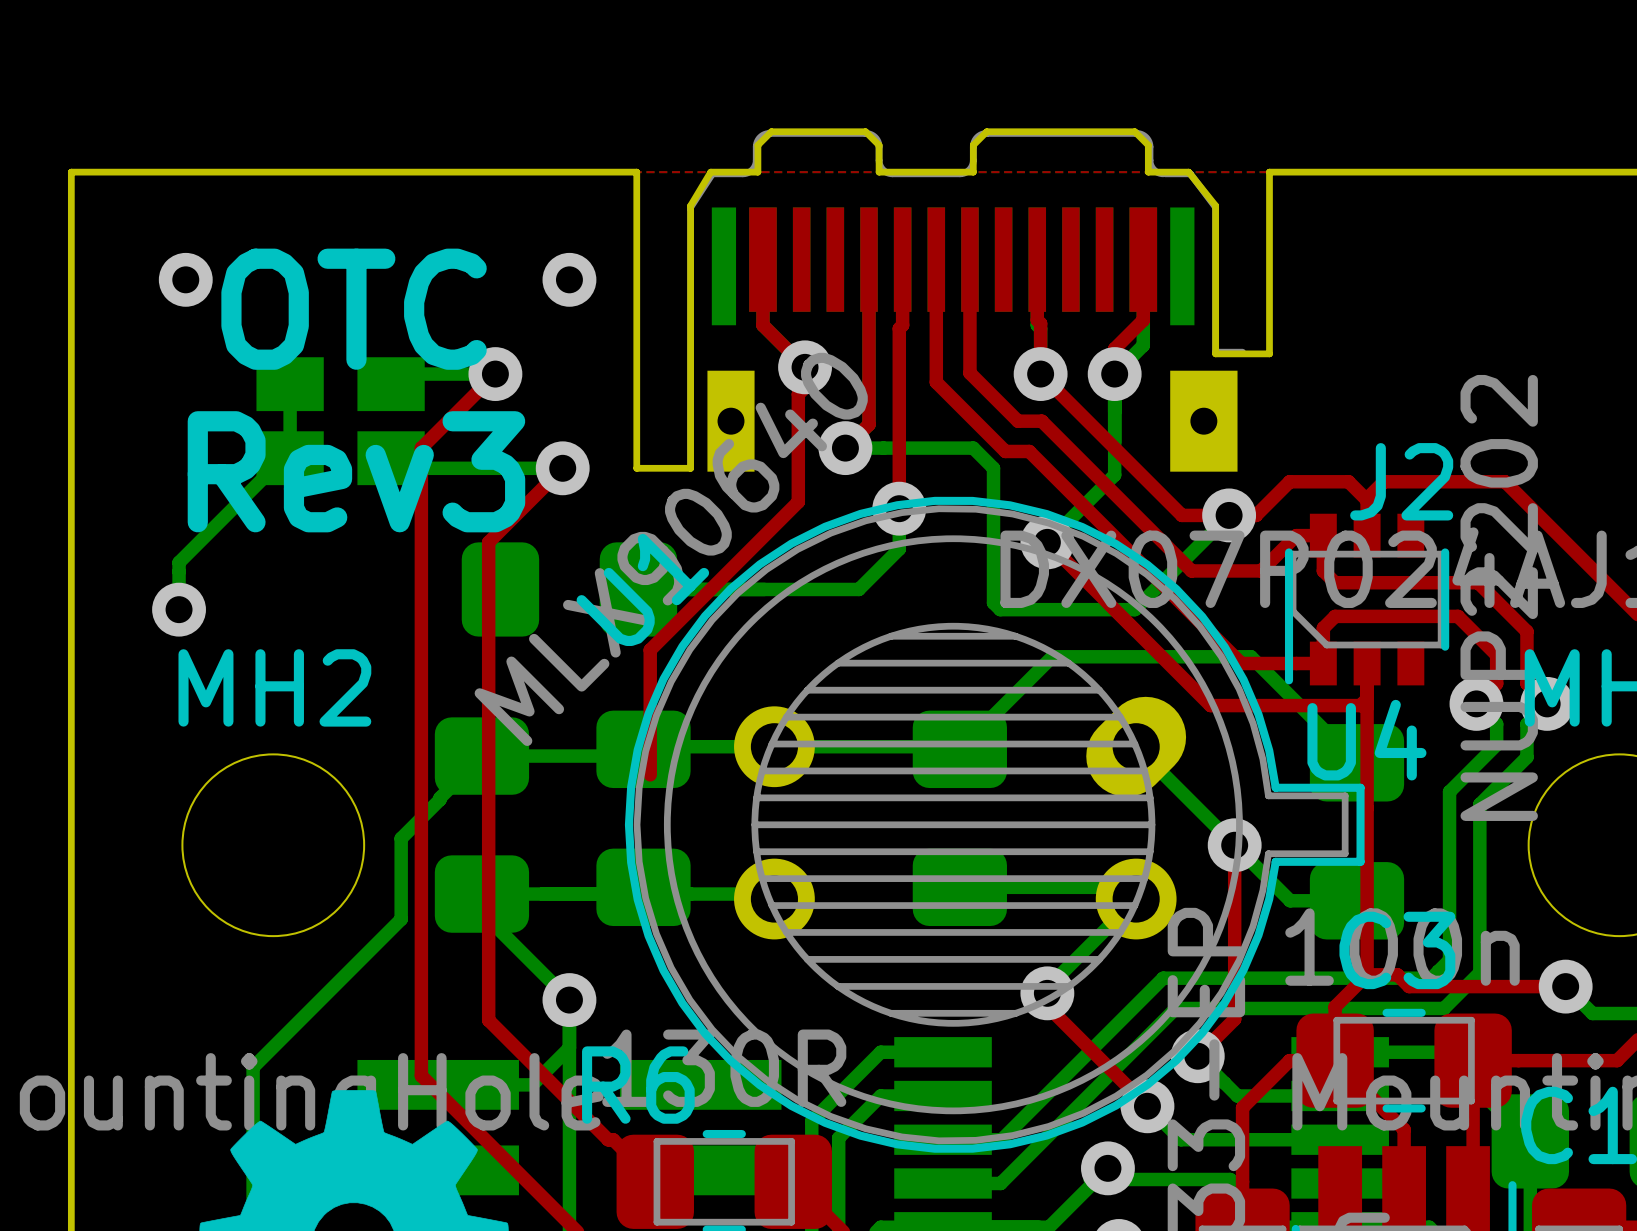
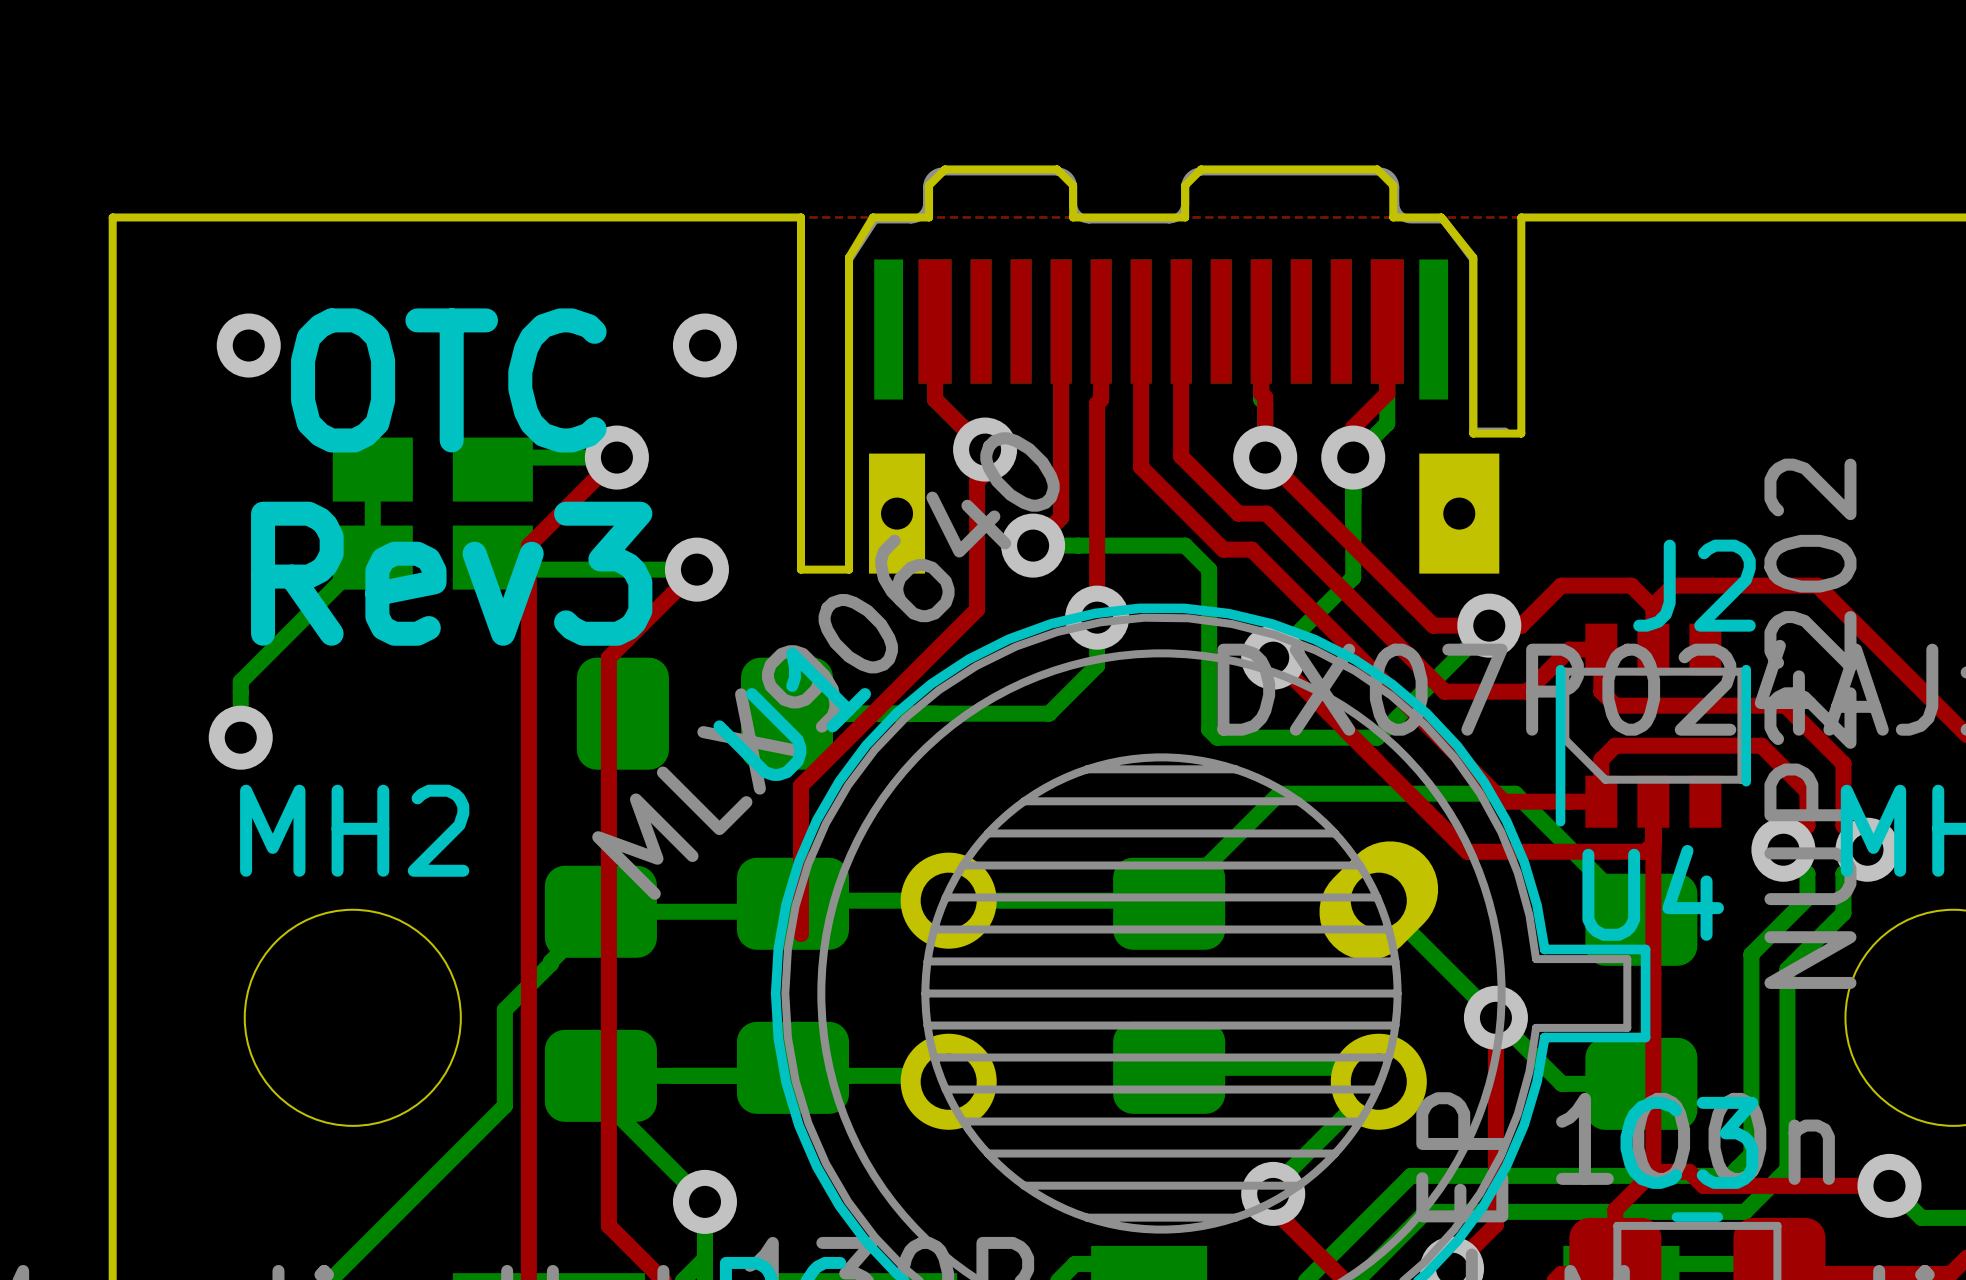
board edge: (636, 172) (636, 468) (650, 468) -> (784, 217) (801, 217) (801, 569)
board edge: (1269, 172) (1269, 353) (1256, 353) -> (1537, 217) (1521, 217) (1521, 433)

